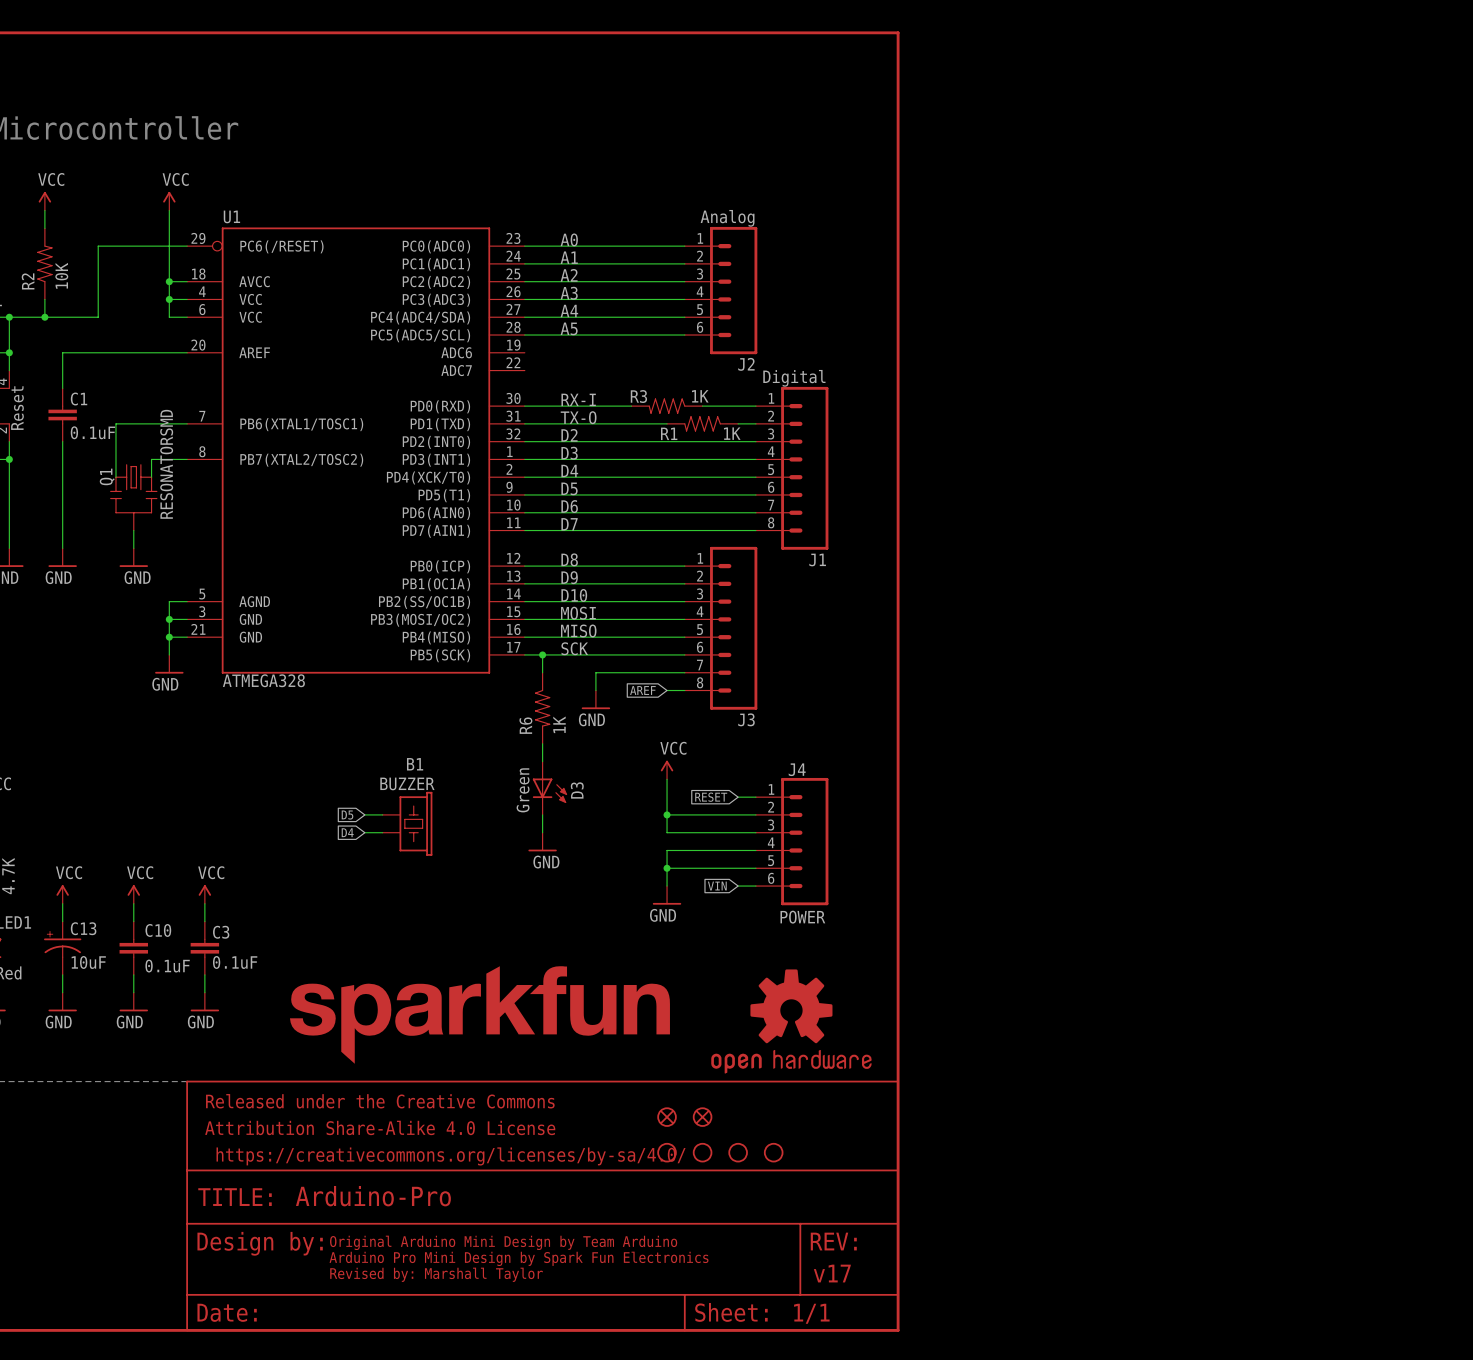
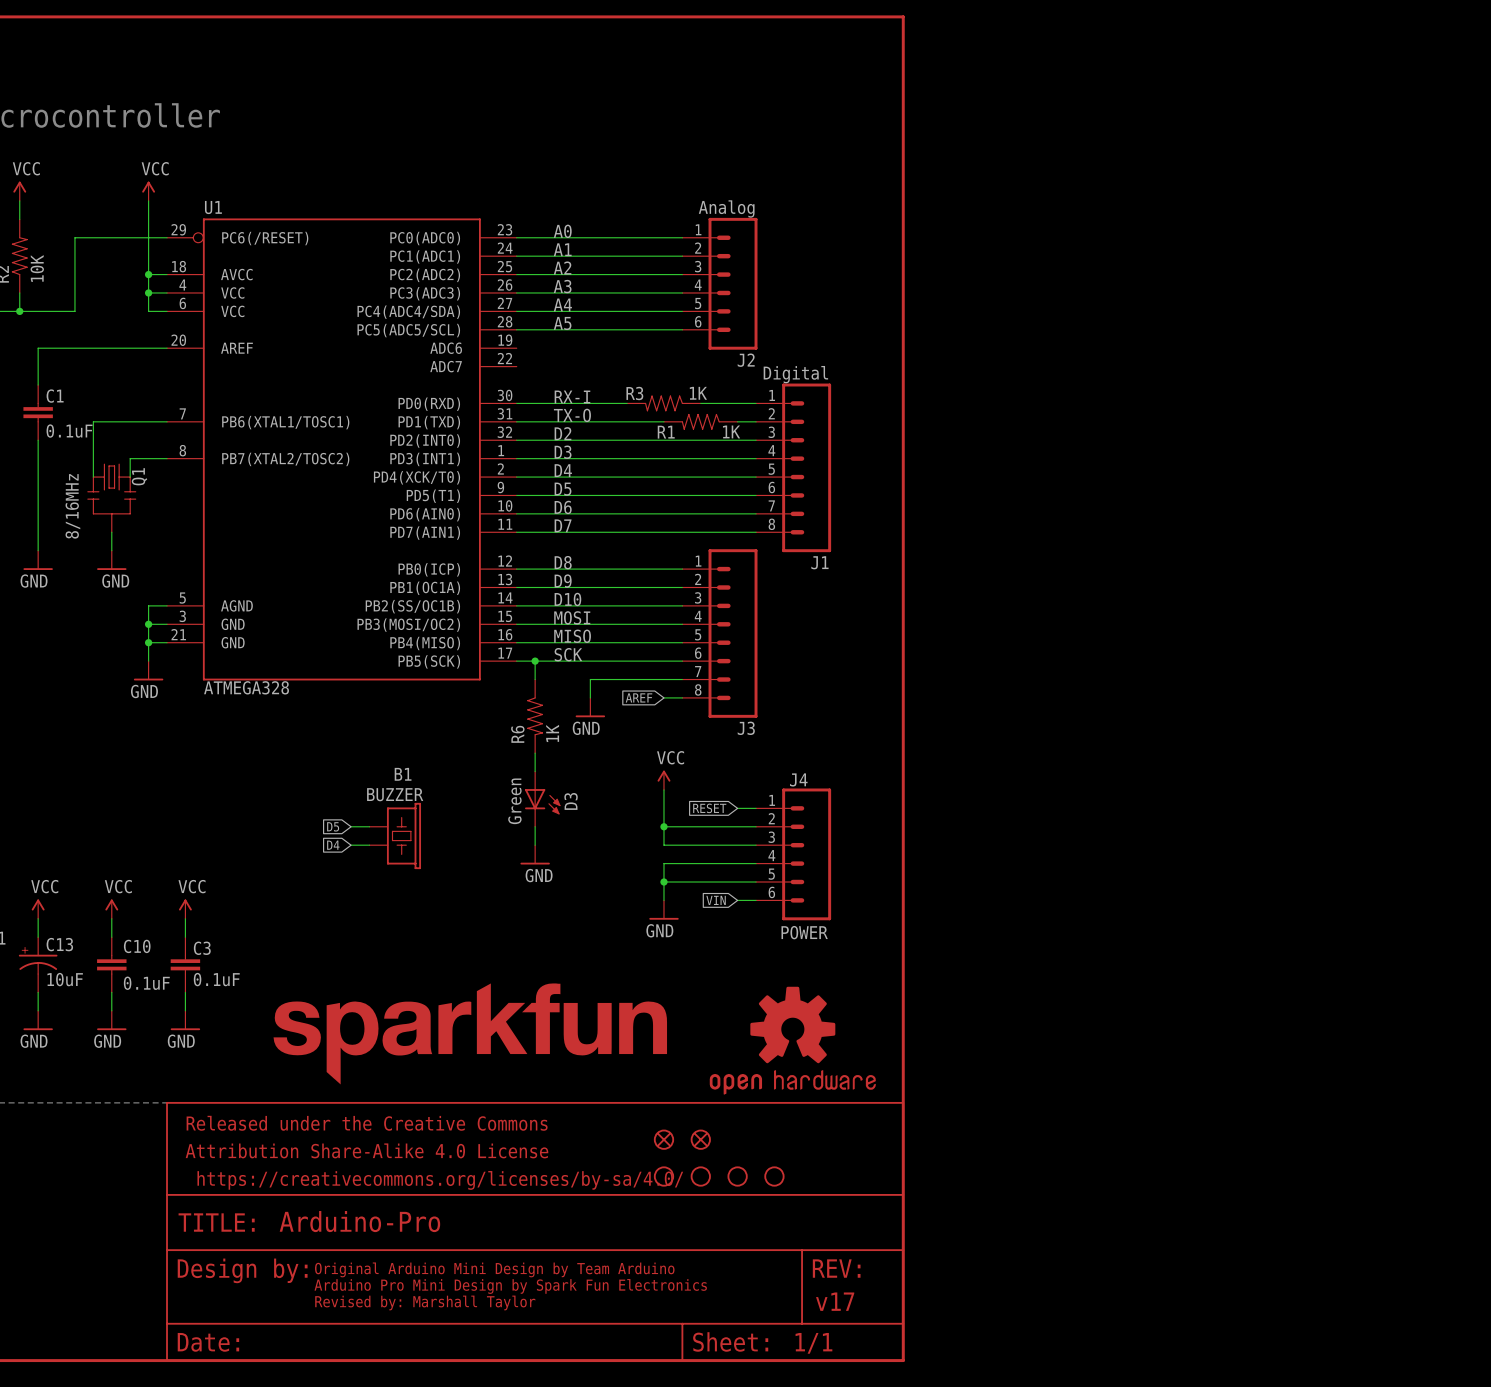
Q1 value: RESONATORSMD (166, 464) -> 8/16MHz (72, 506)
Q1 name position: Q1 (107, 476) -> Q1 (139, 476)

